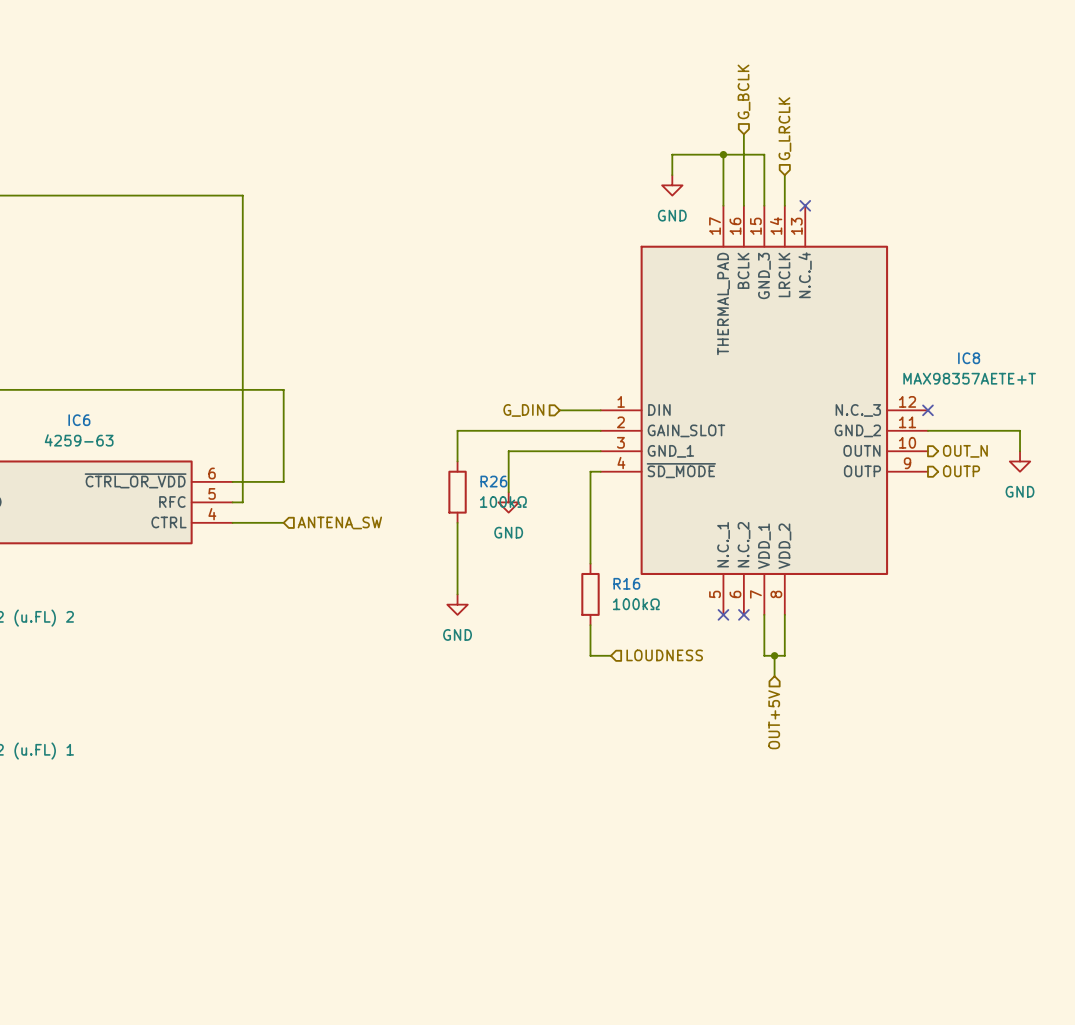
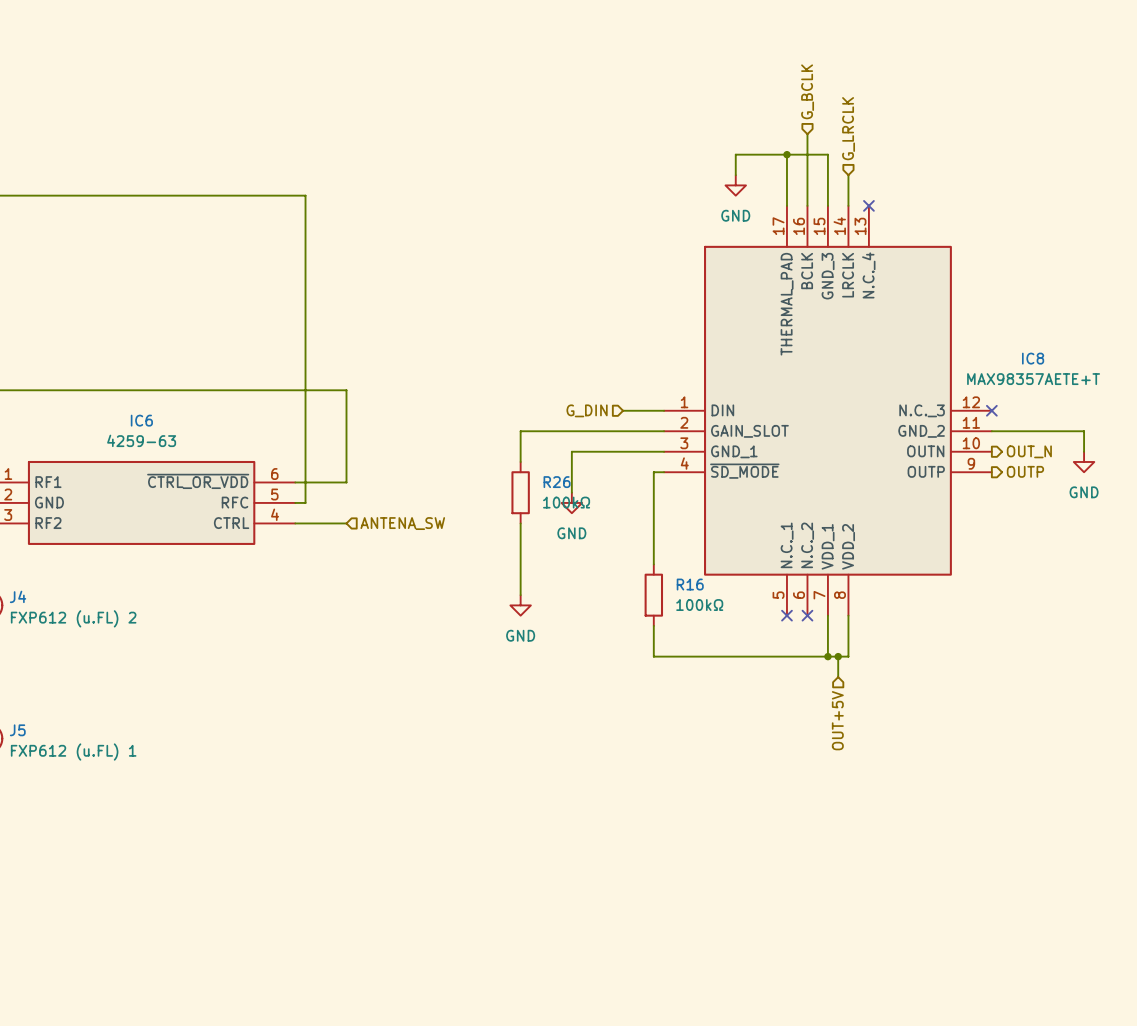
wire: none -> (674, 656) (827, 656)
hierarchical label: LOUDNESS (664, 655) -> none
junction: none -> (827, 656)

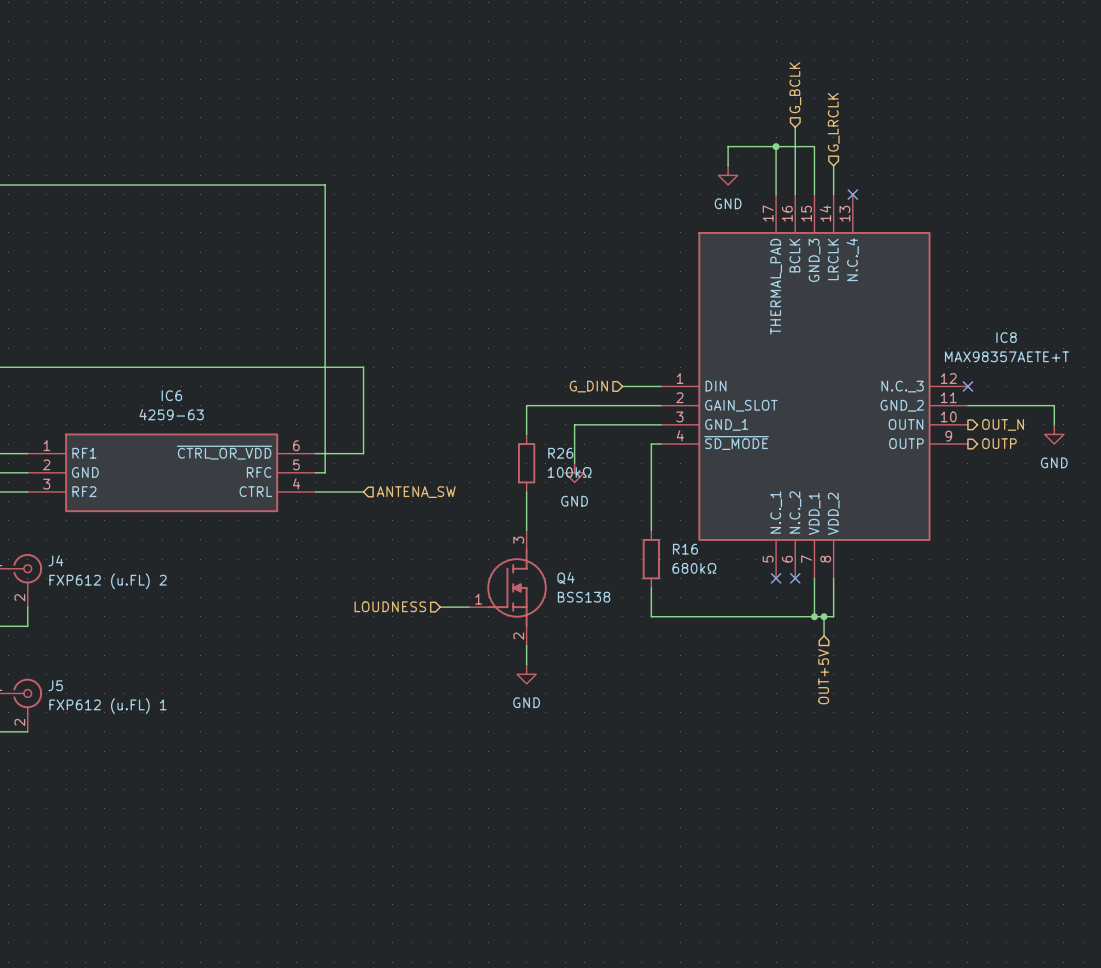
power symbol position: GND (520, 605) -> GND (526, 674)
R16 value: 100kΩ (699, 605) -> 680kΩ (694, 568)
Q4: none -> BSS138 (507, 587)
hierarchical label: none -> LOUDNESS (390, 606)
wire: none -> (440, 607) (469, 607)
wire: none -> (526, 645) (526, 664)

